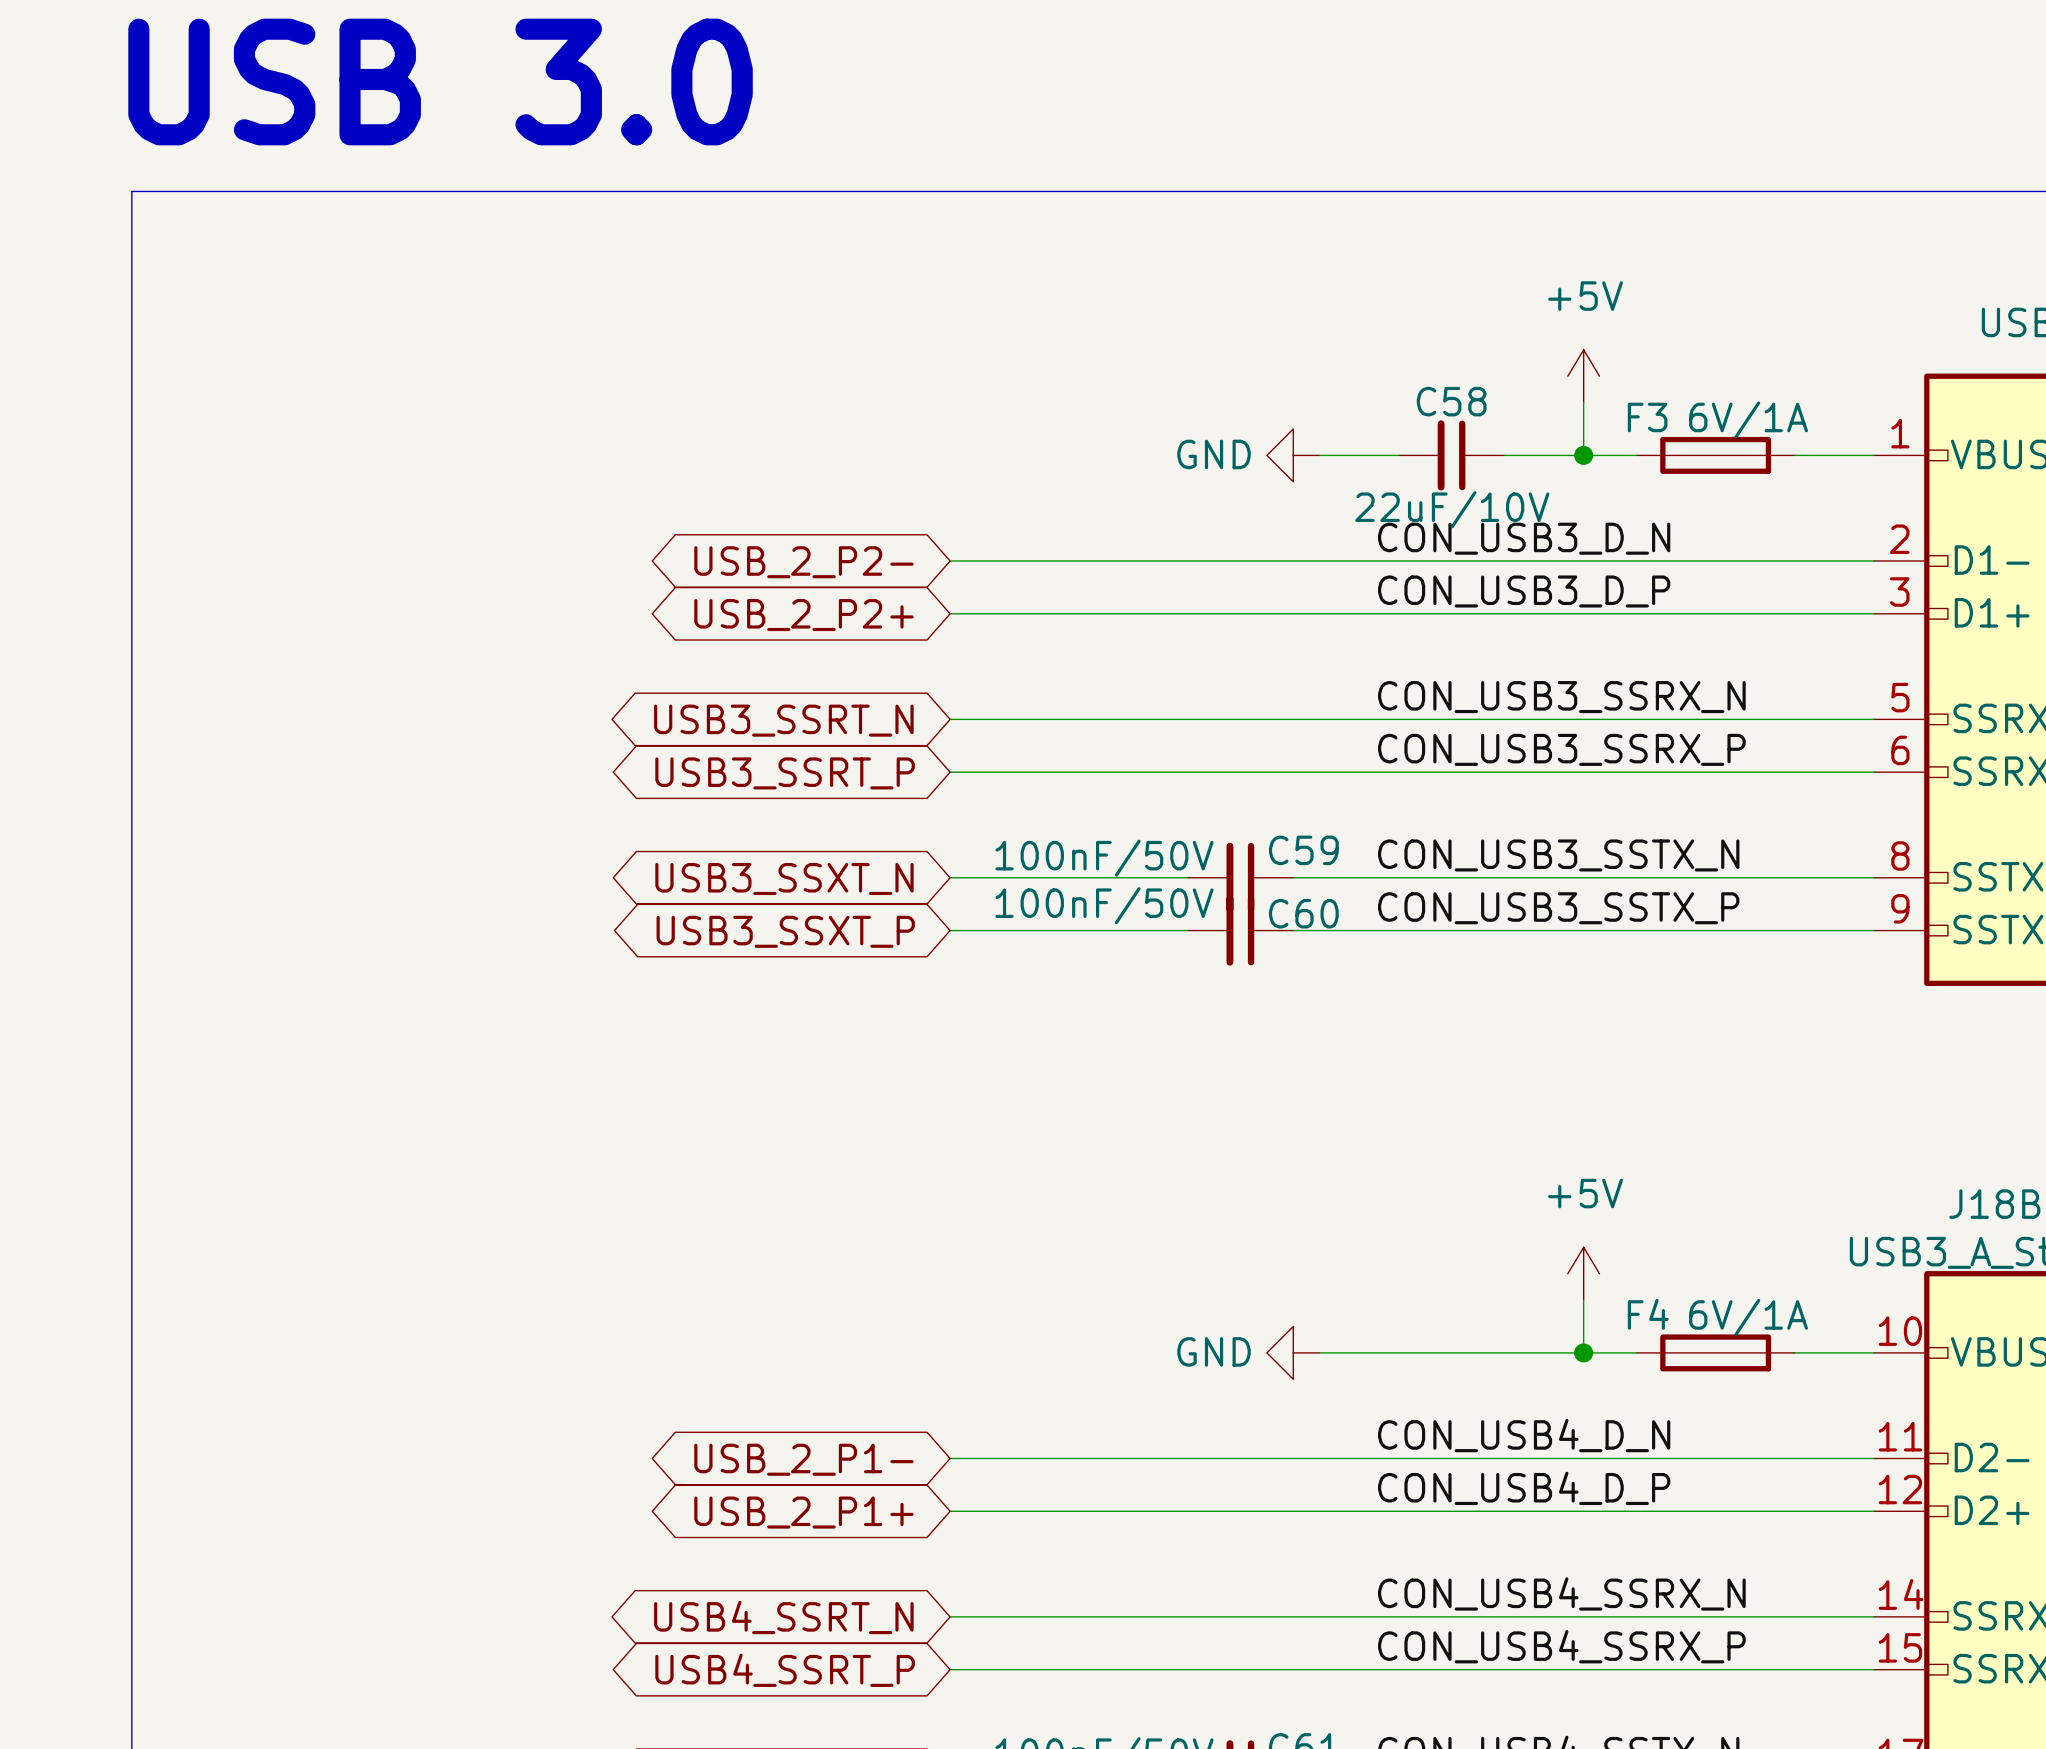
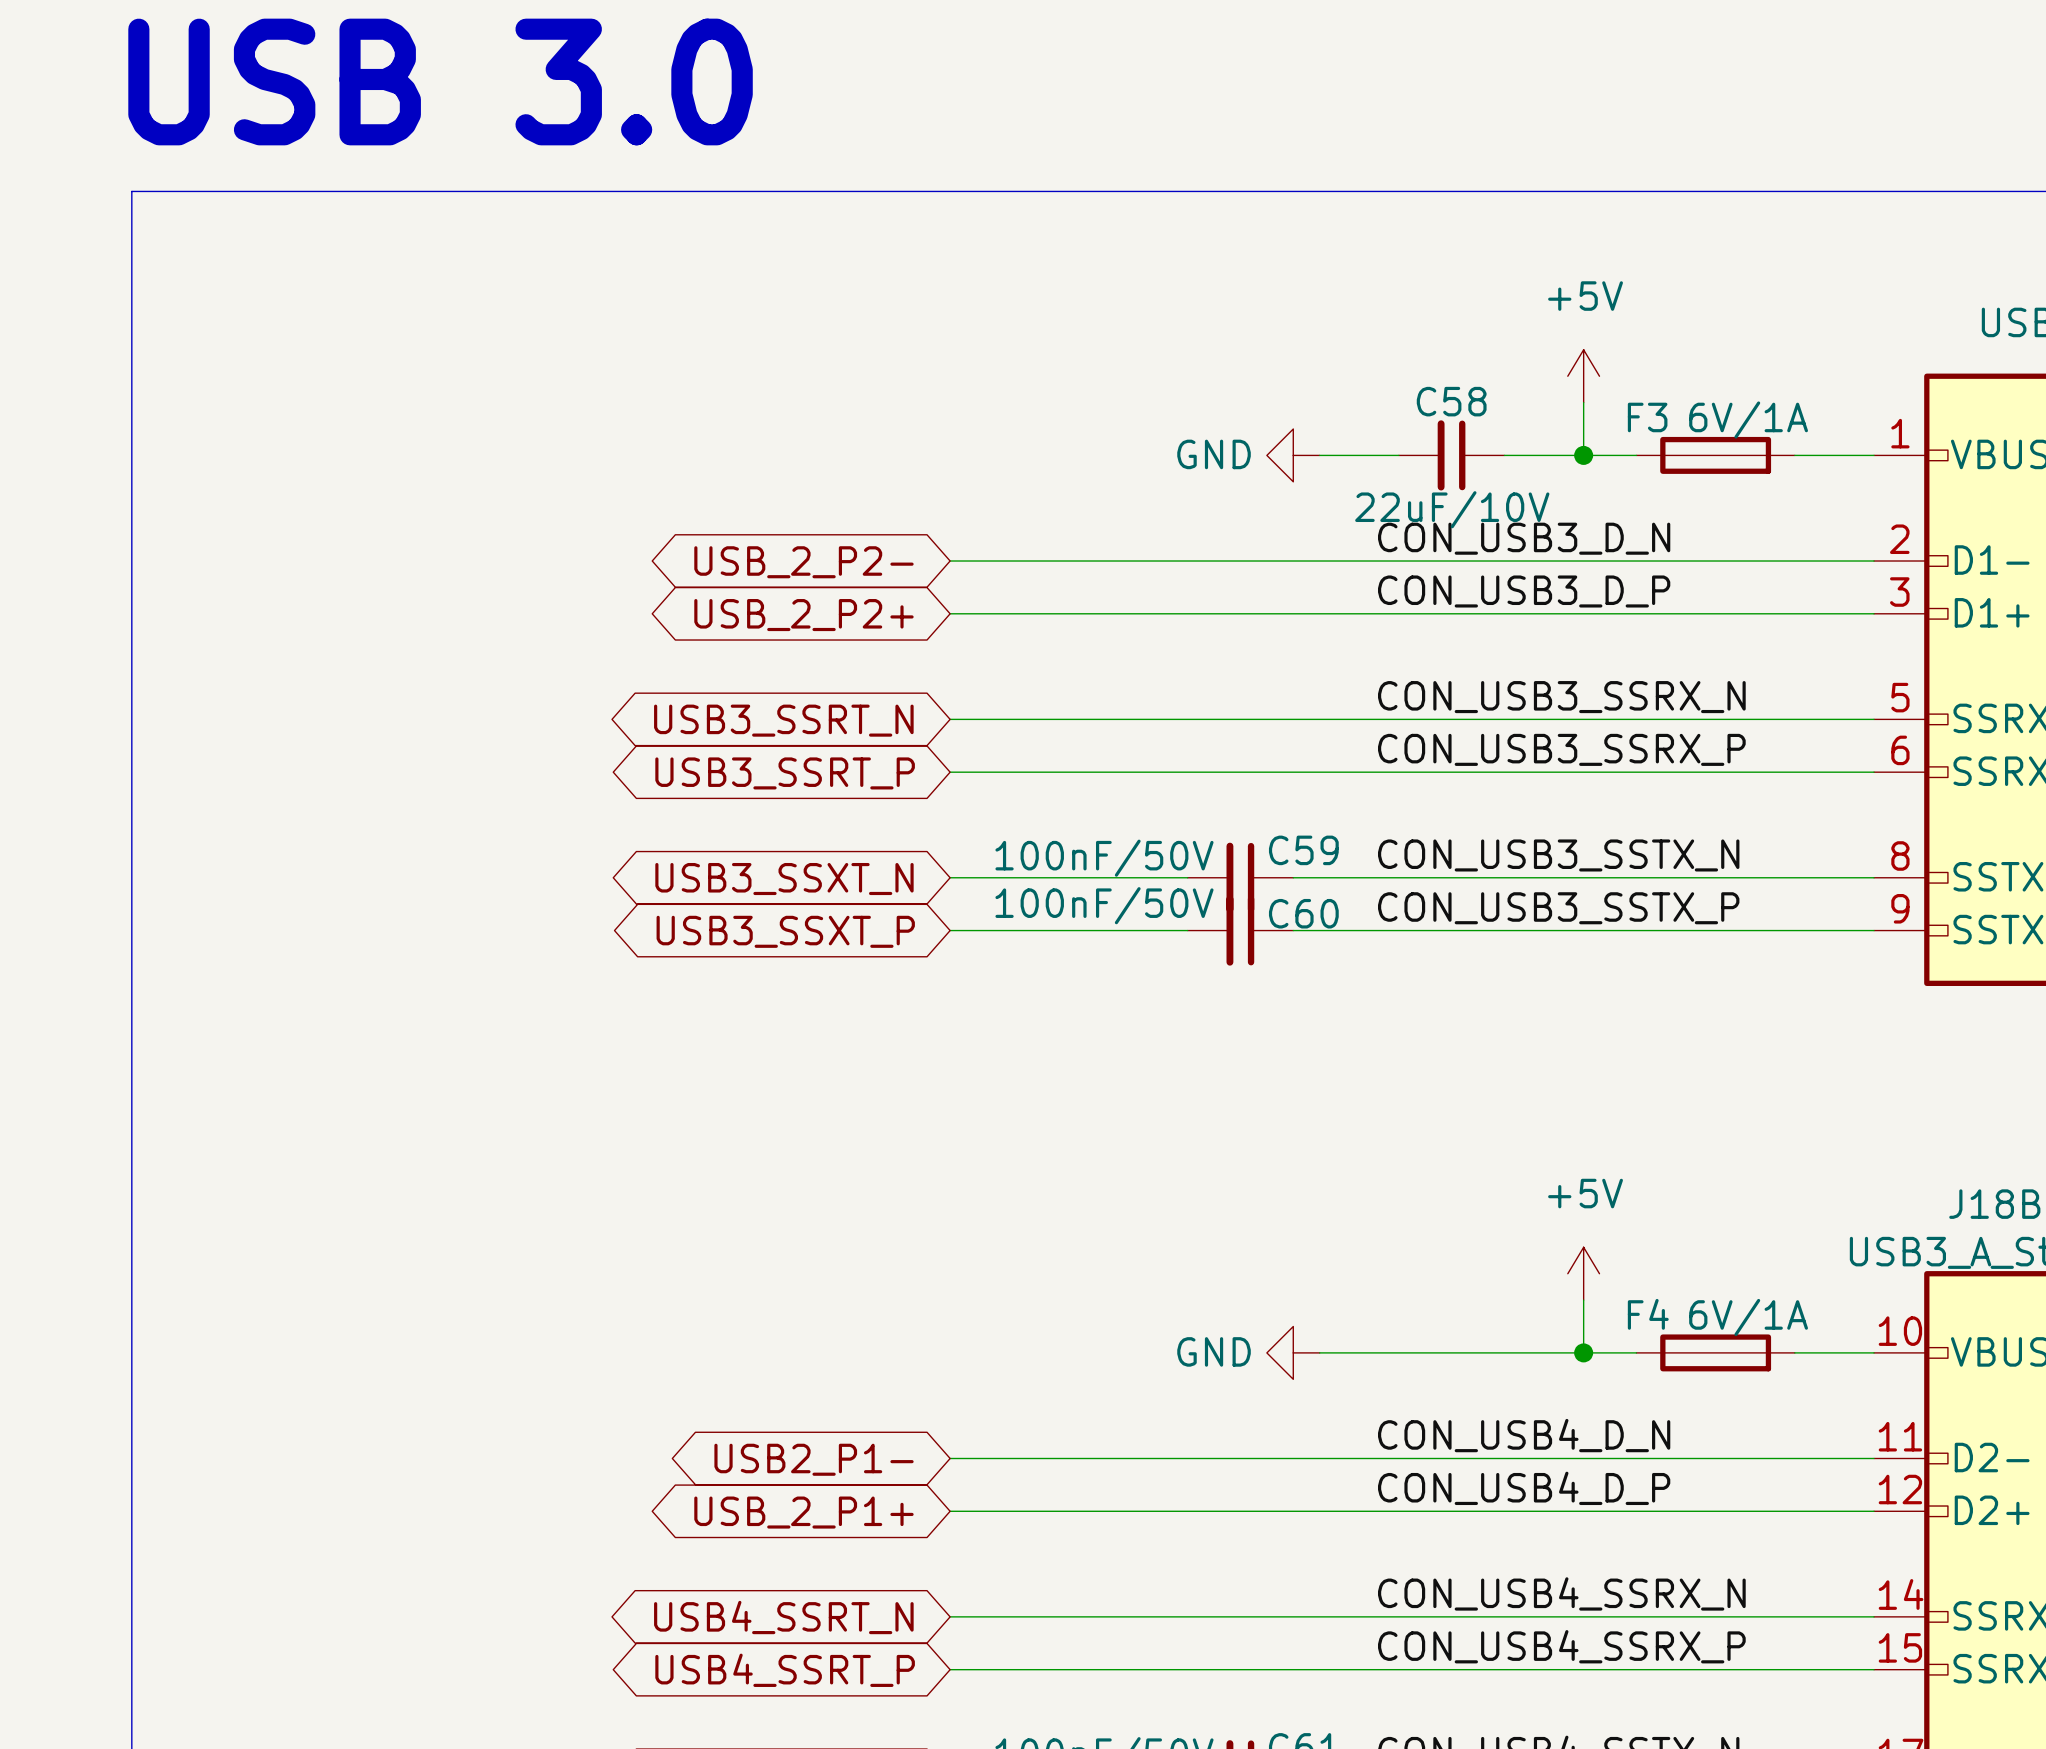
global label: USB_2_P1- (803, 1459) -> USB2_P1- (814, 1459)

